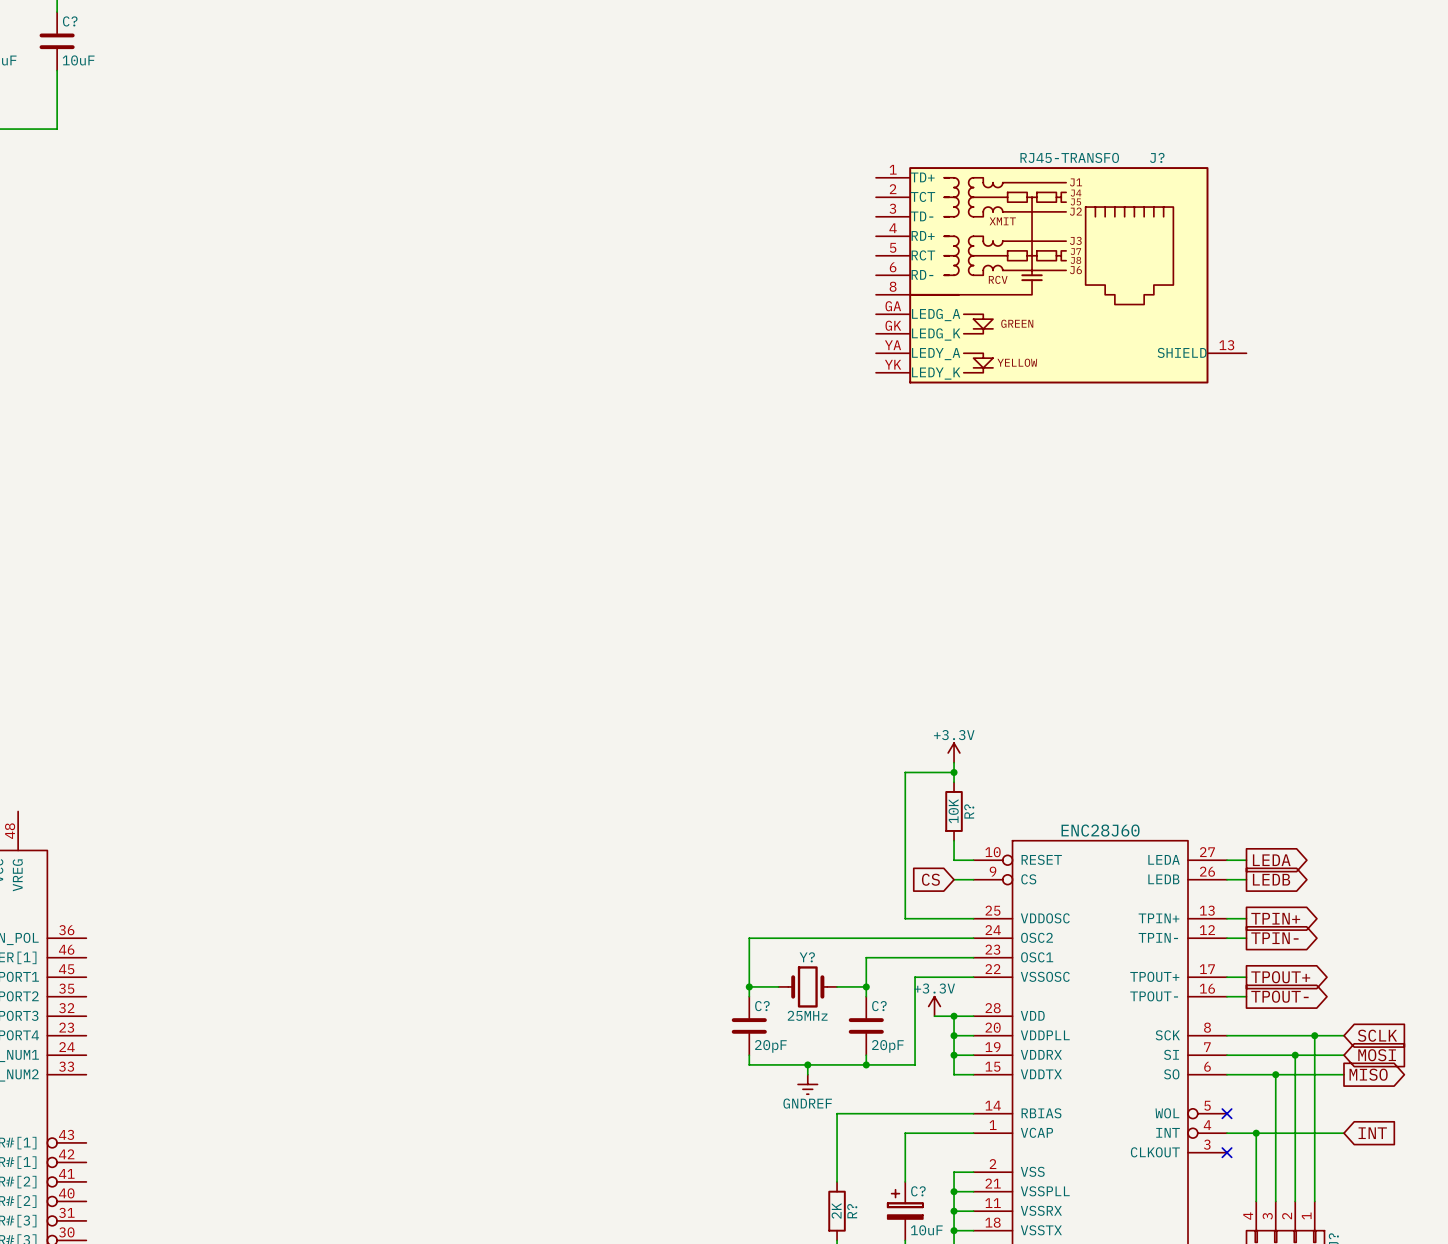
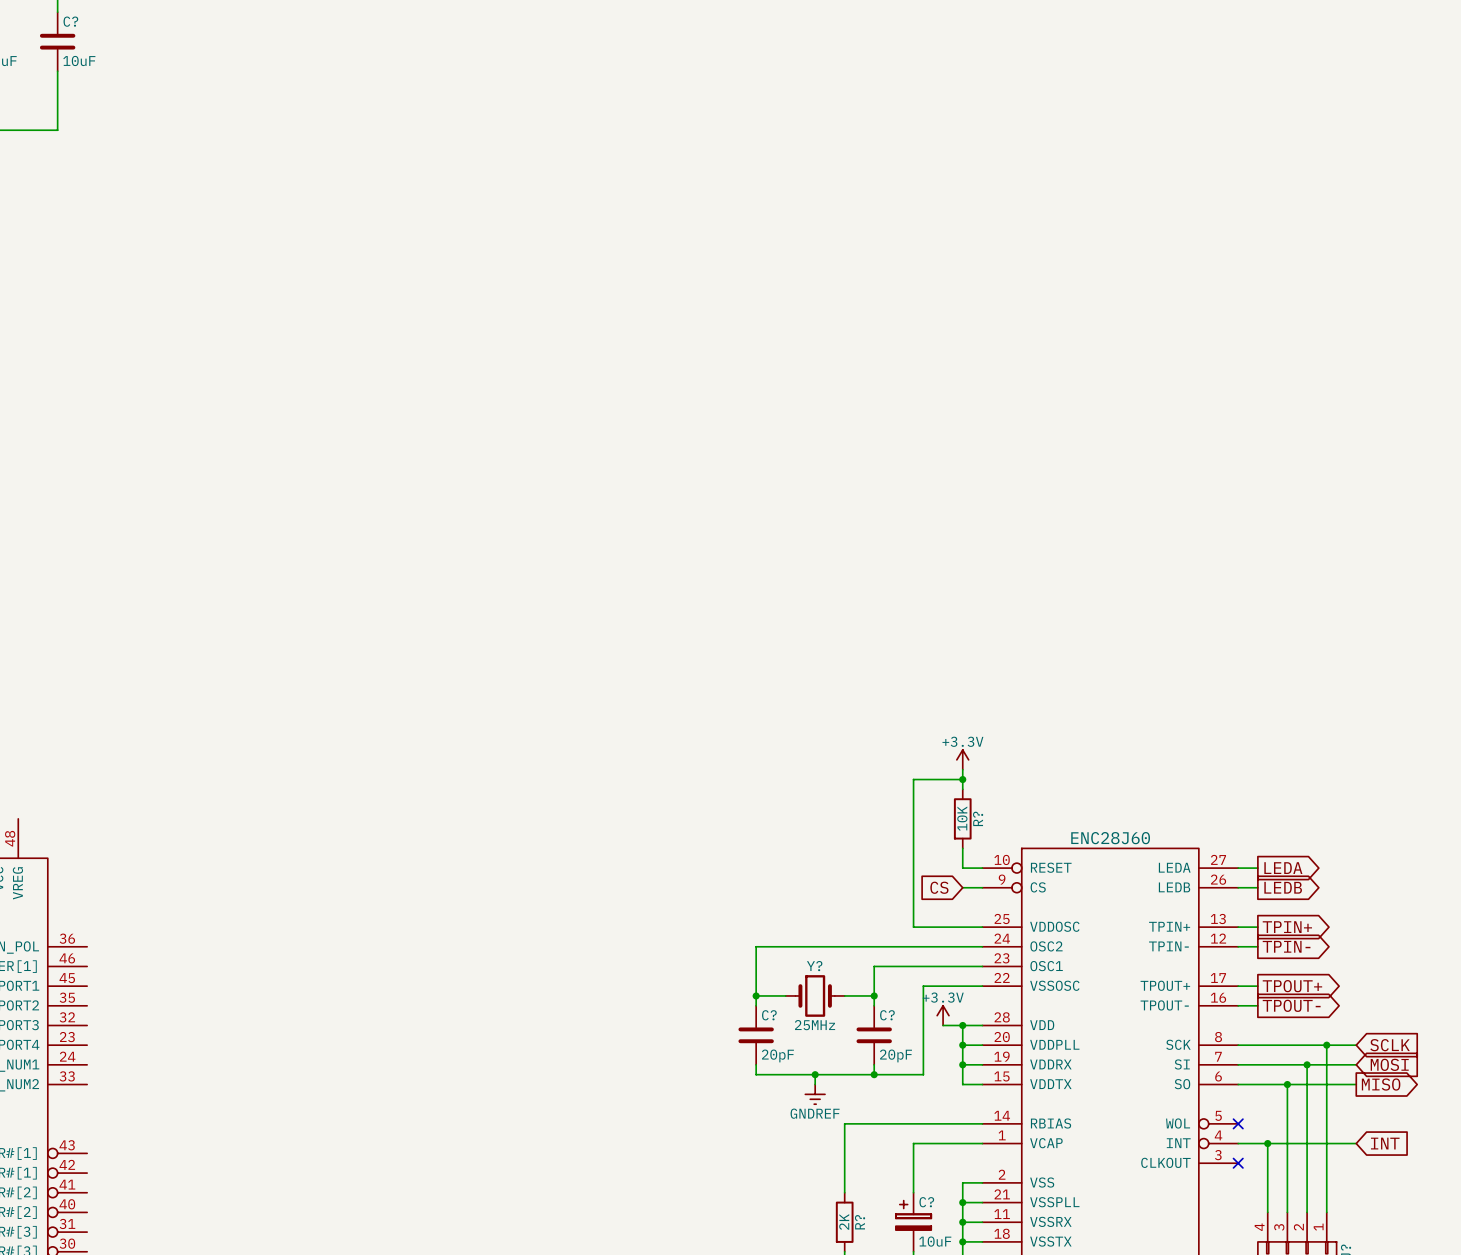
J?: RJ45-TRANSFO (1061, 275) -> none

